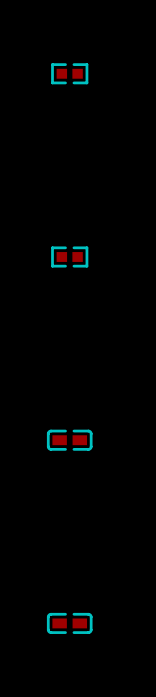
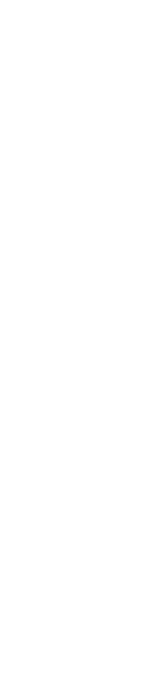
part: (69, 73) -> none
part: (69, 256) -> none
part: (69, 440) -> none
part: (69, 623) -> none

